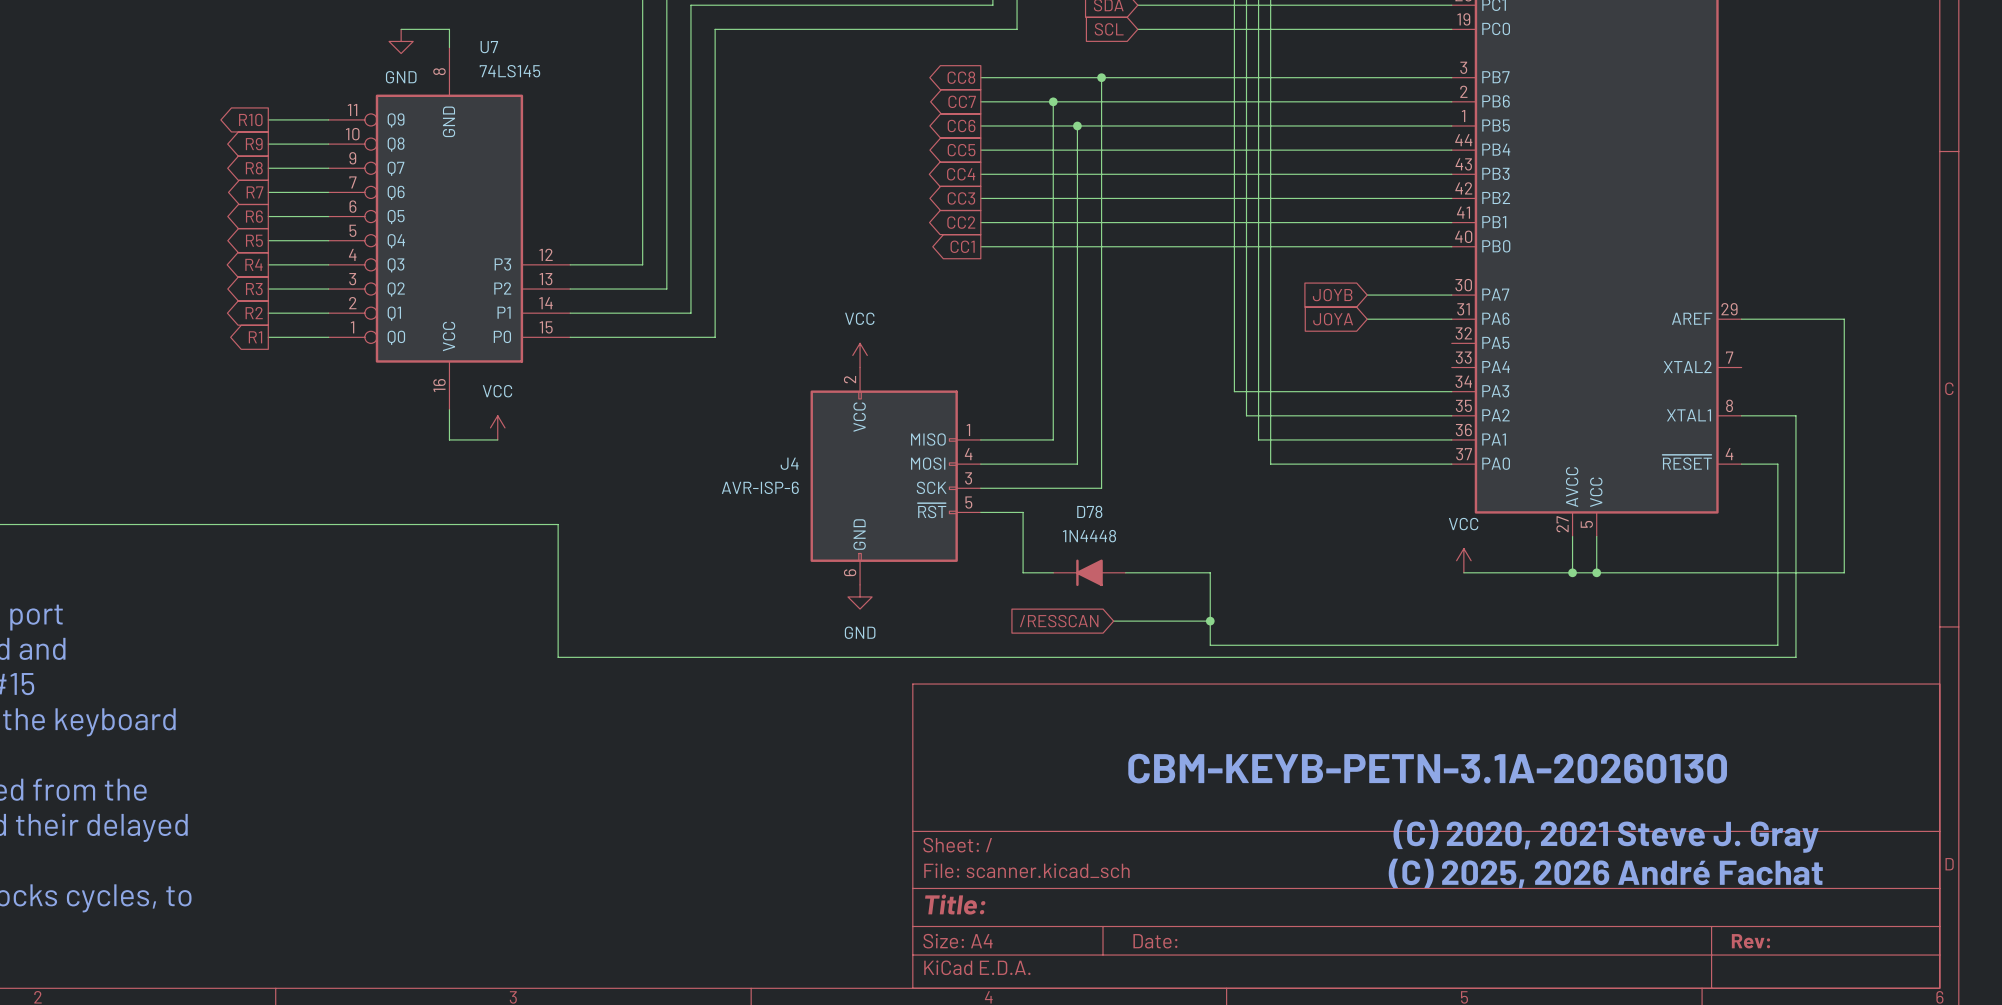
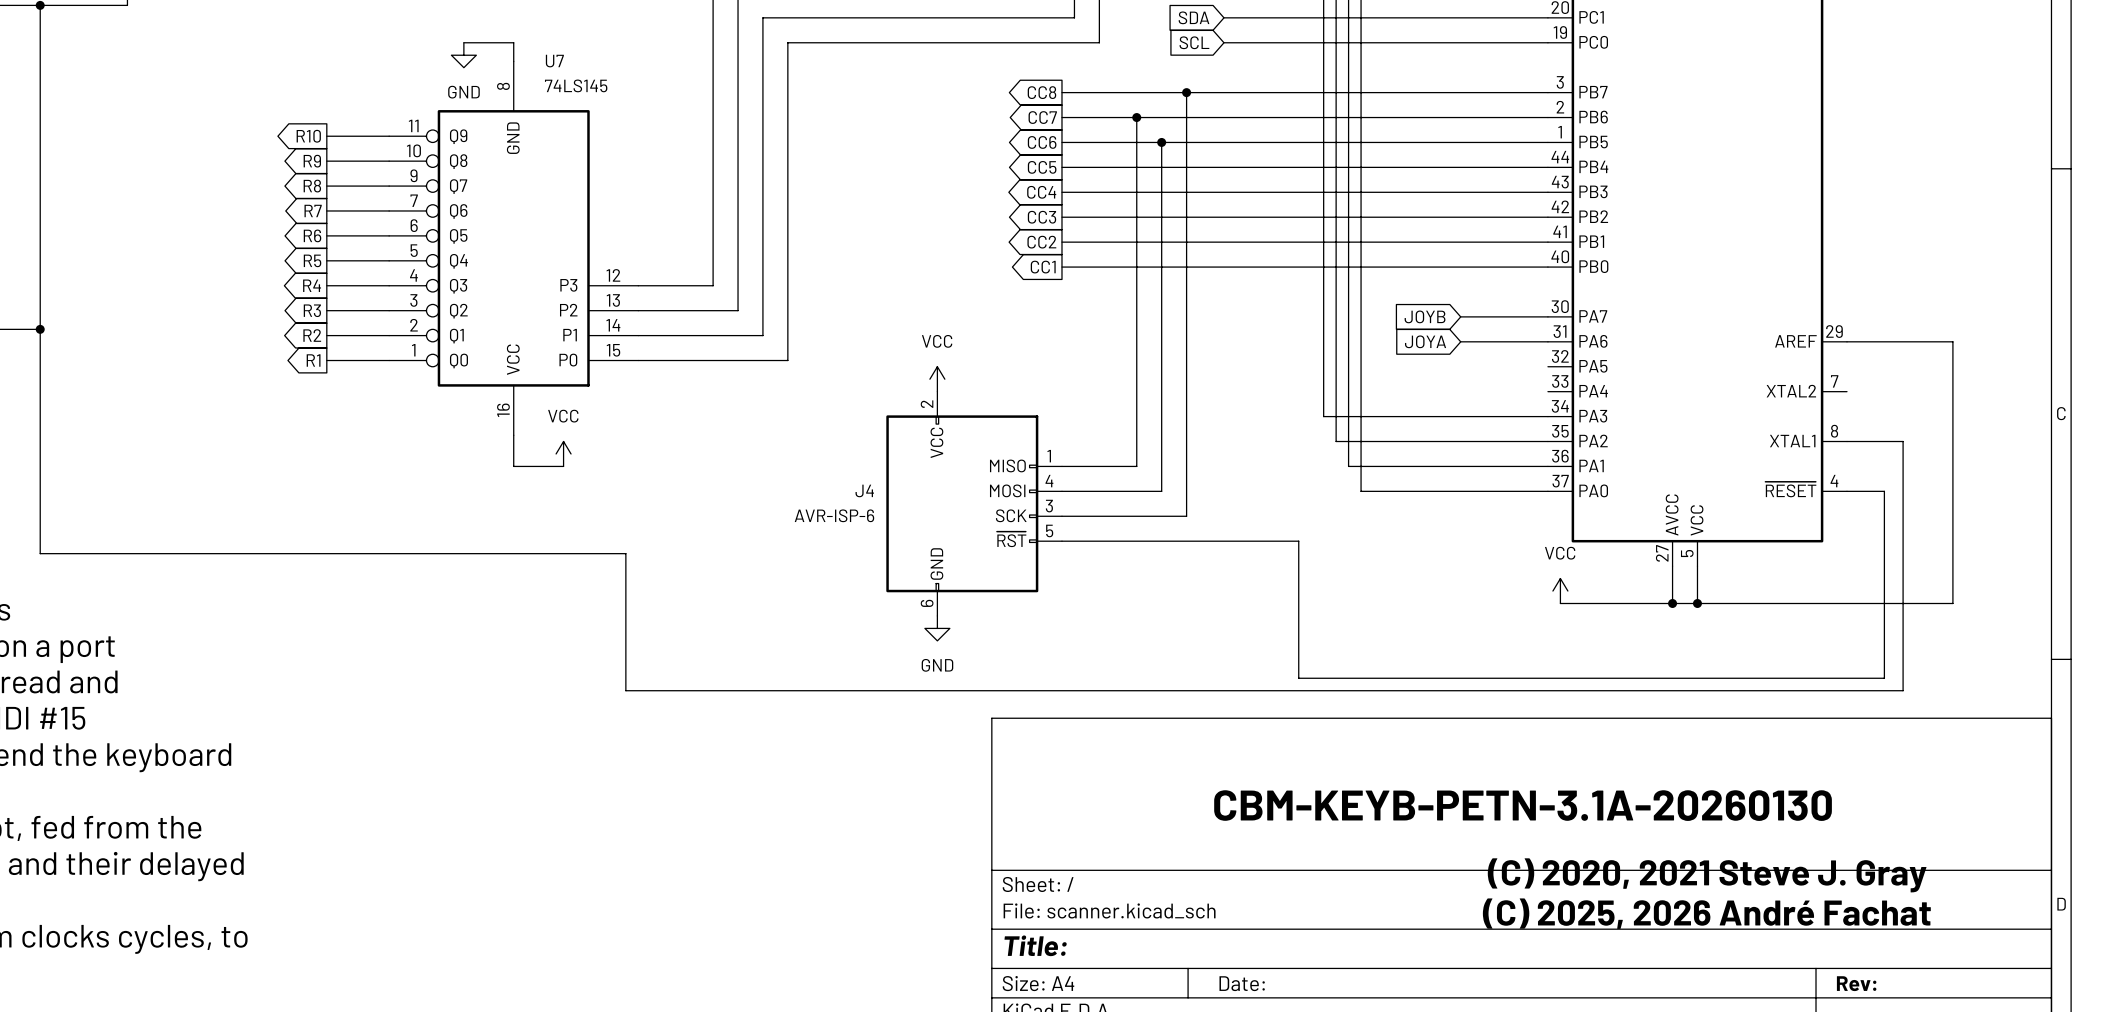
wire: (1023, 512) (1023, 572) (1053, 572) -> none
D78: 1N4448 (1089, 572) -> none
wire: (1125, 572) (1210, 572) -> (1105, 541) (1298, 541) (1298, 603)
global label: /RESSCAN (1059, 621) -> none
wire: (1113, 621) (1210, 621) -> none
junction: (1210, 621) -> none

